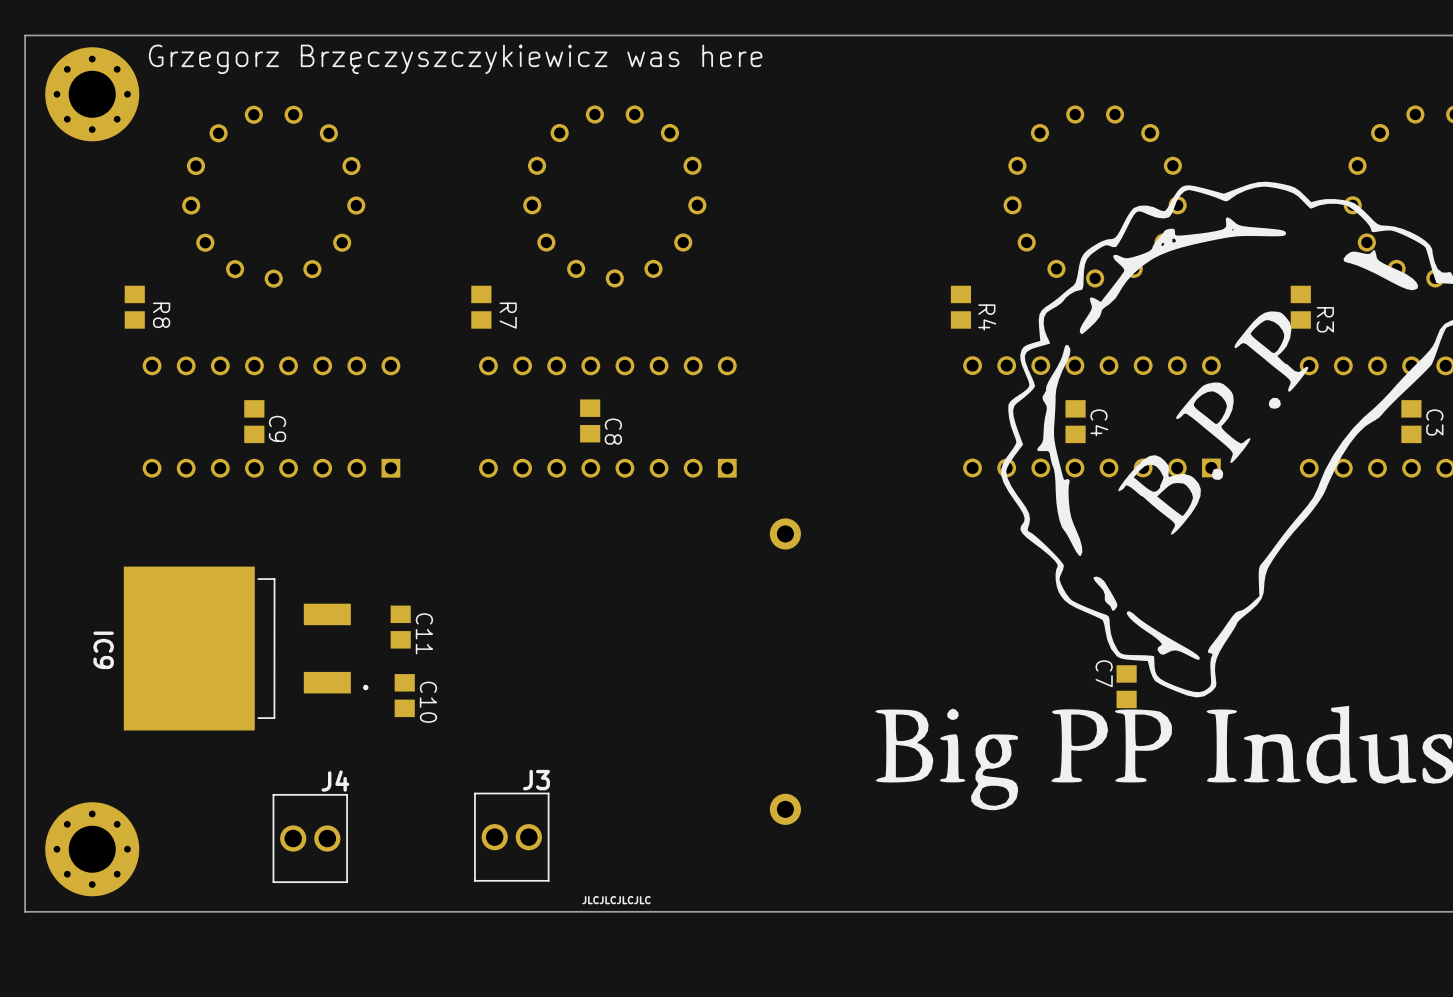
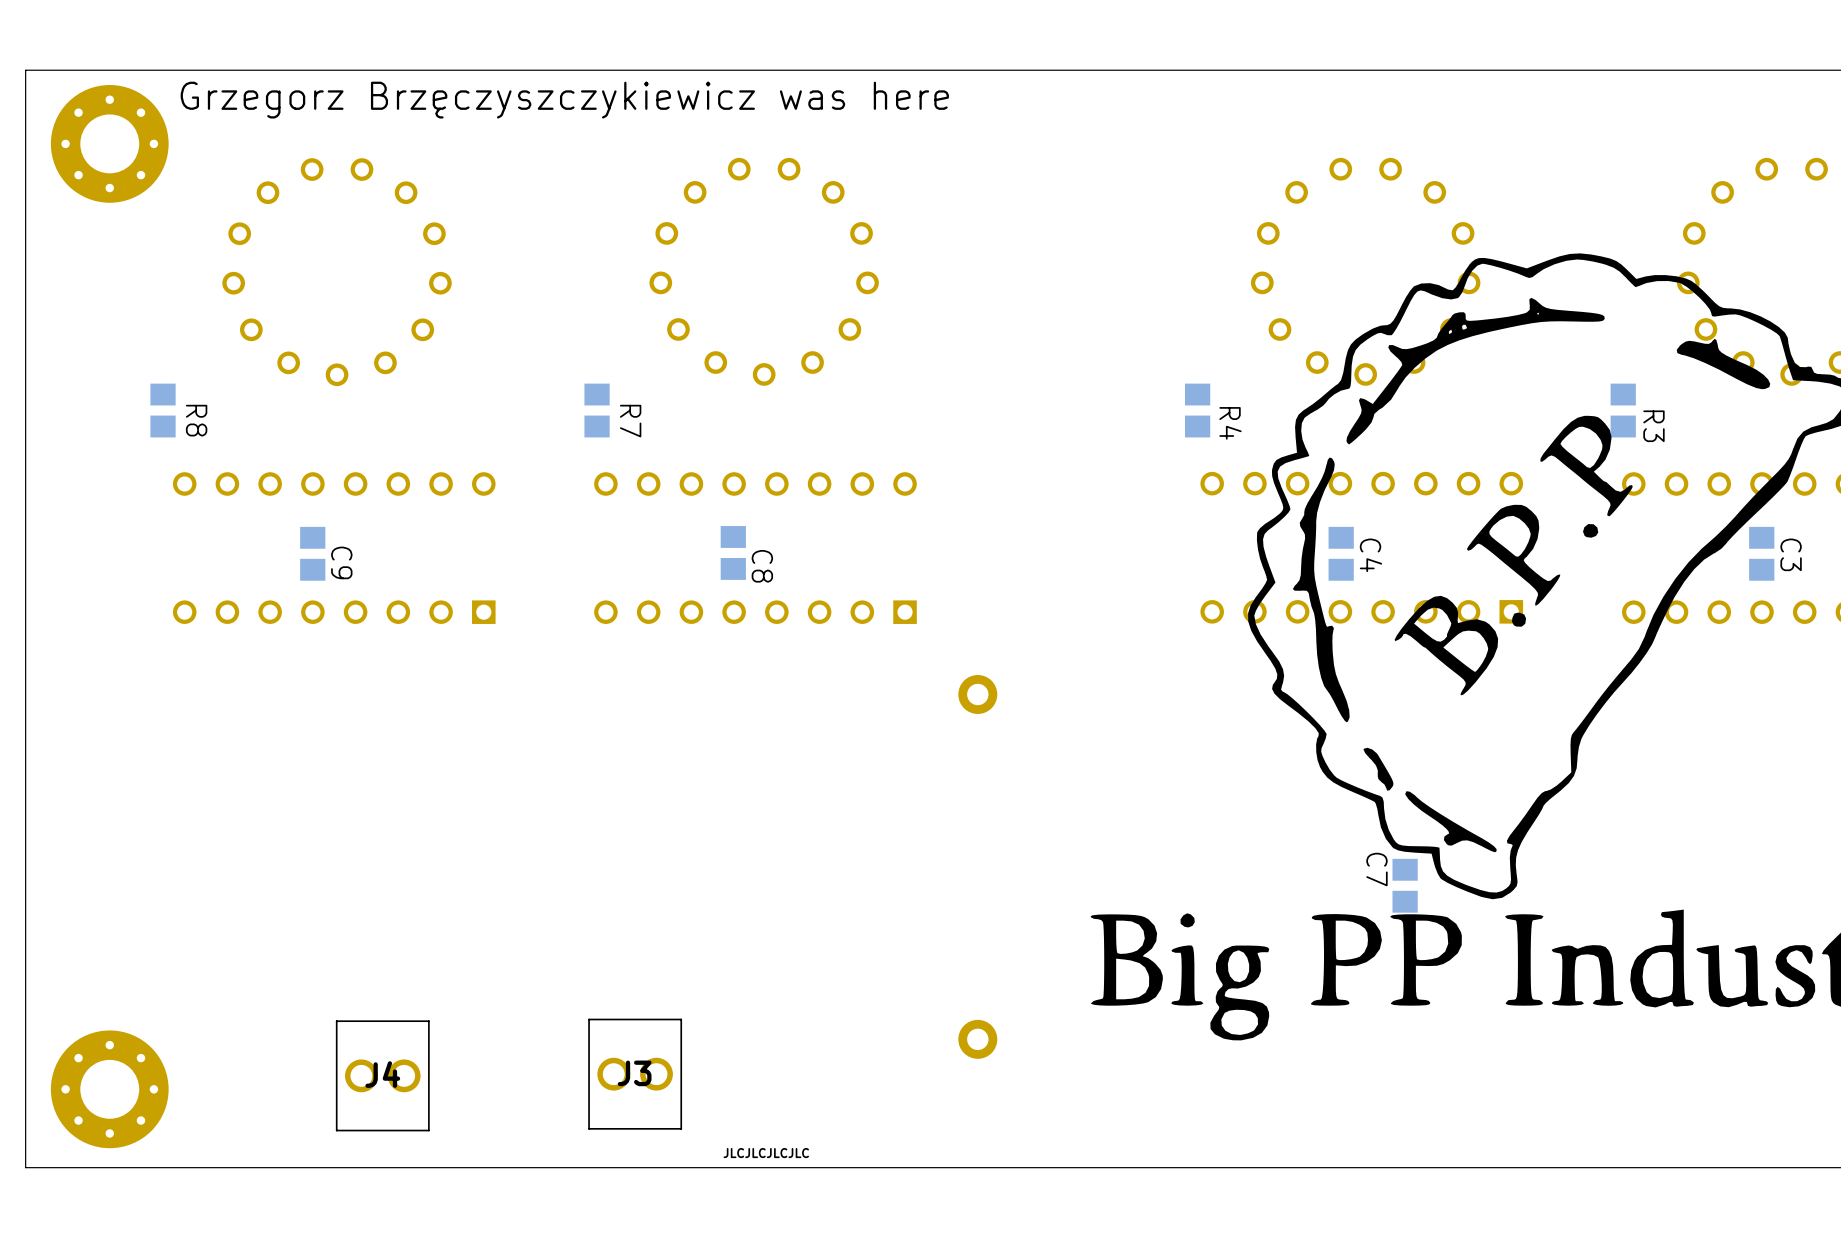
C11: (400, 627) -> none
IC9: (246, 648) -> none
C10: (404, 695) -> none
J3 name position: J3 (536, 780) -> J3 (634, 1073)
J4 name position: J4 (335, 781) -> J4 (382, 1074)

